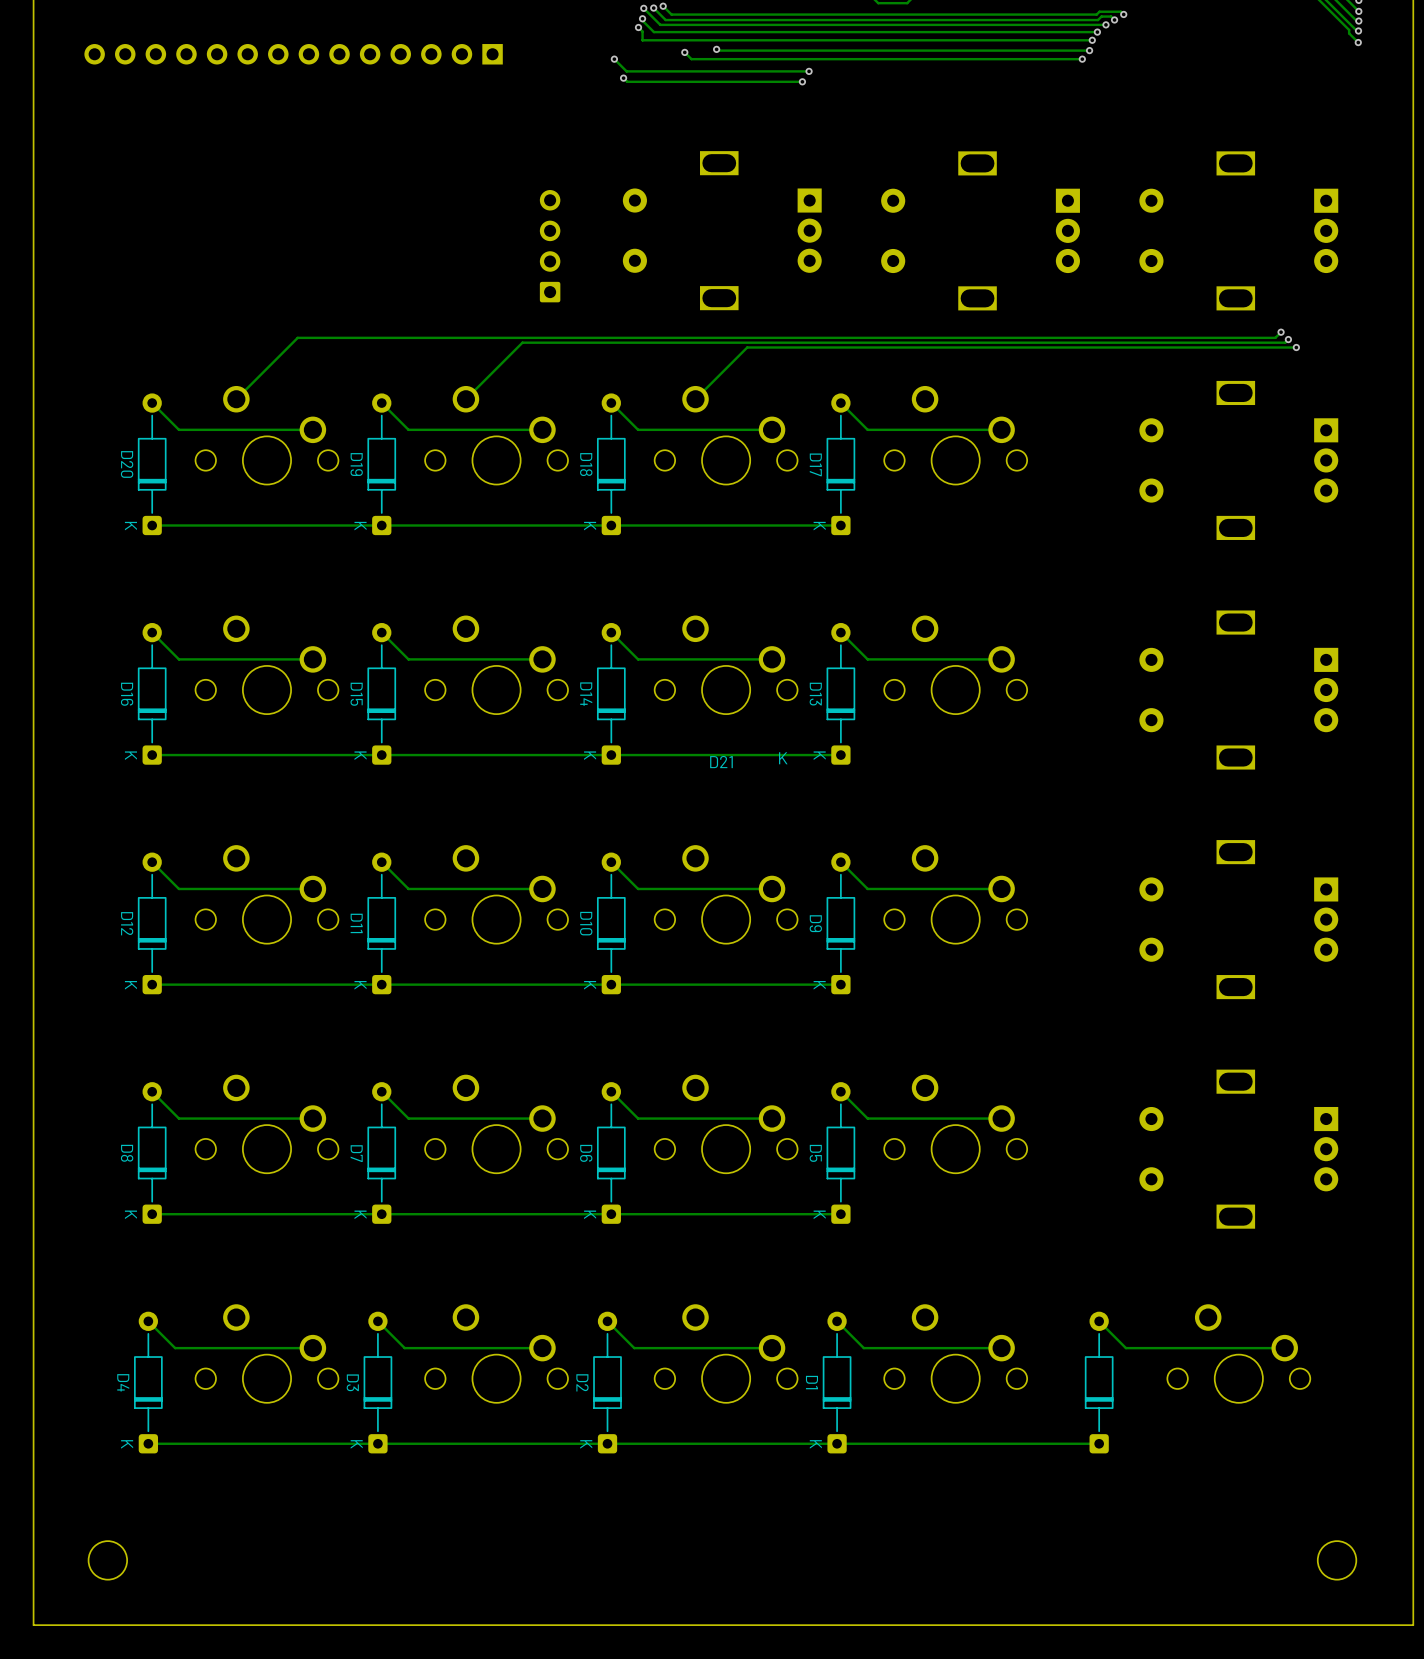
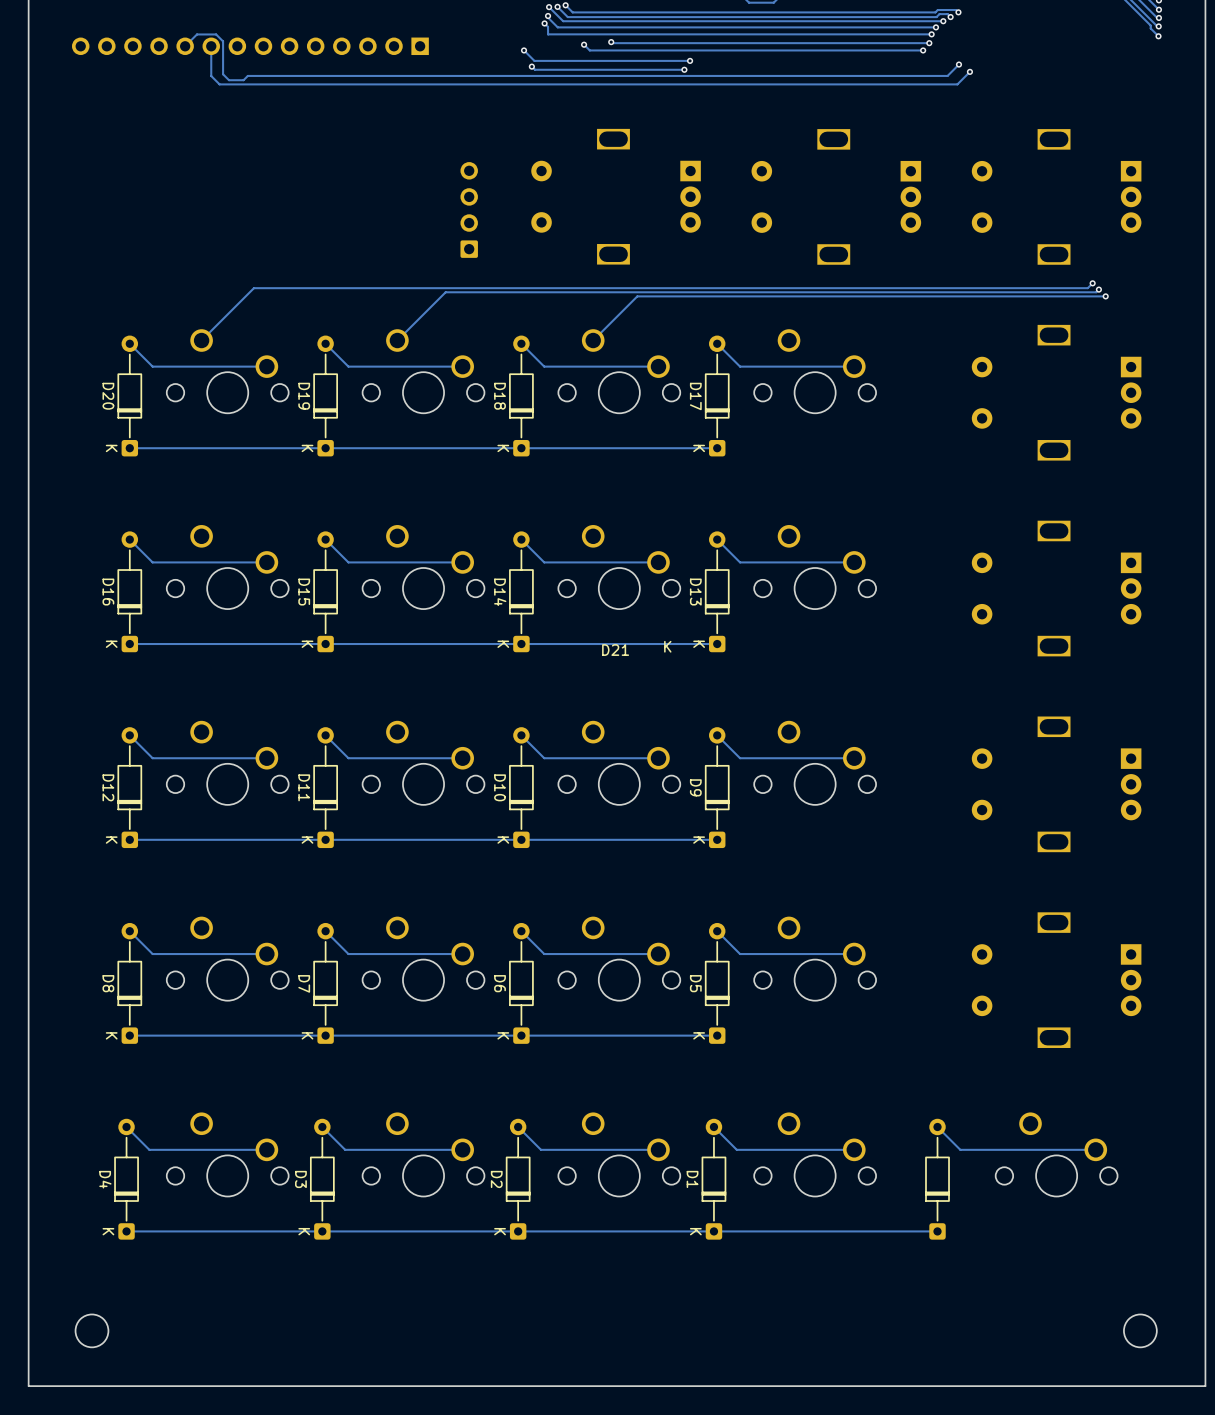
track: none -> (185, 46) (196, 34) (216, 34) (223, 41) (223, 74) (229, 80) (243, 80) (247, 75) (947, 75) (958, 64)
track: none -> (211, 46) (211, 76) (219, 84) (957, 84) (969, 71)
via: none -> (958, 64)
via: none -> (969, 71)

